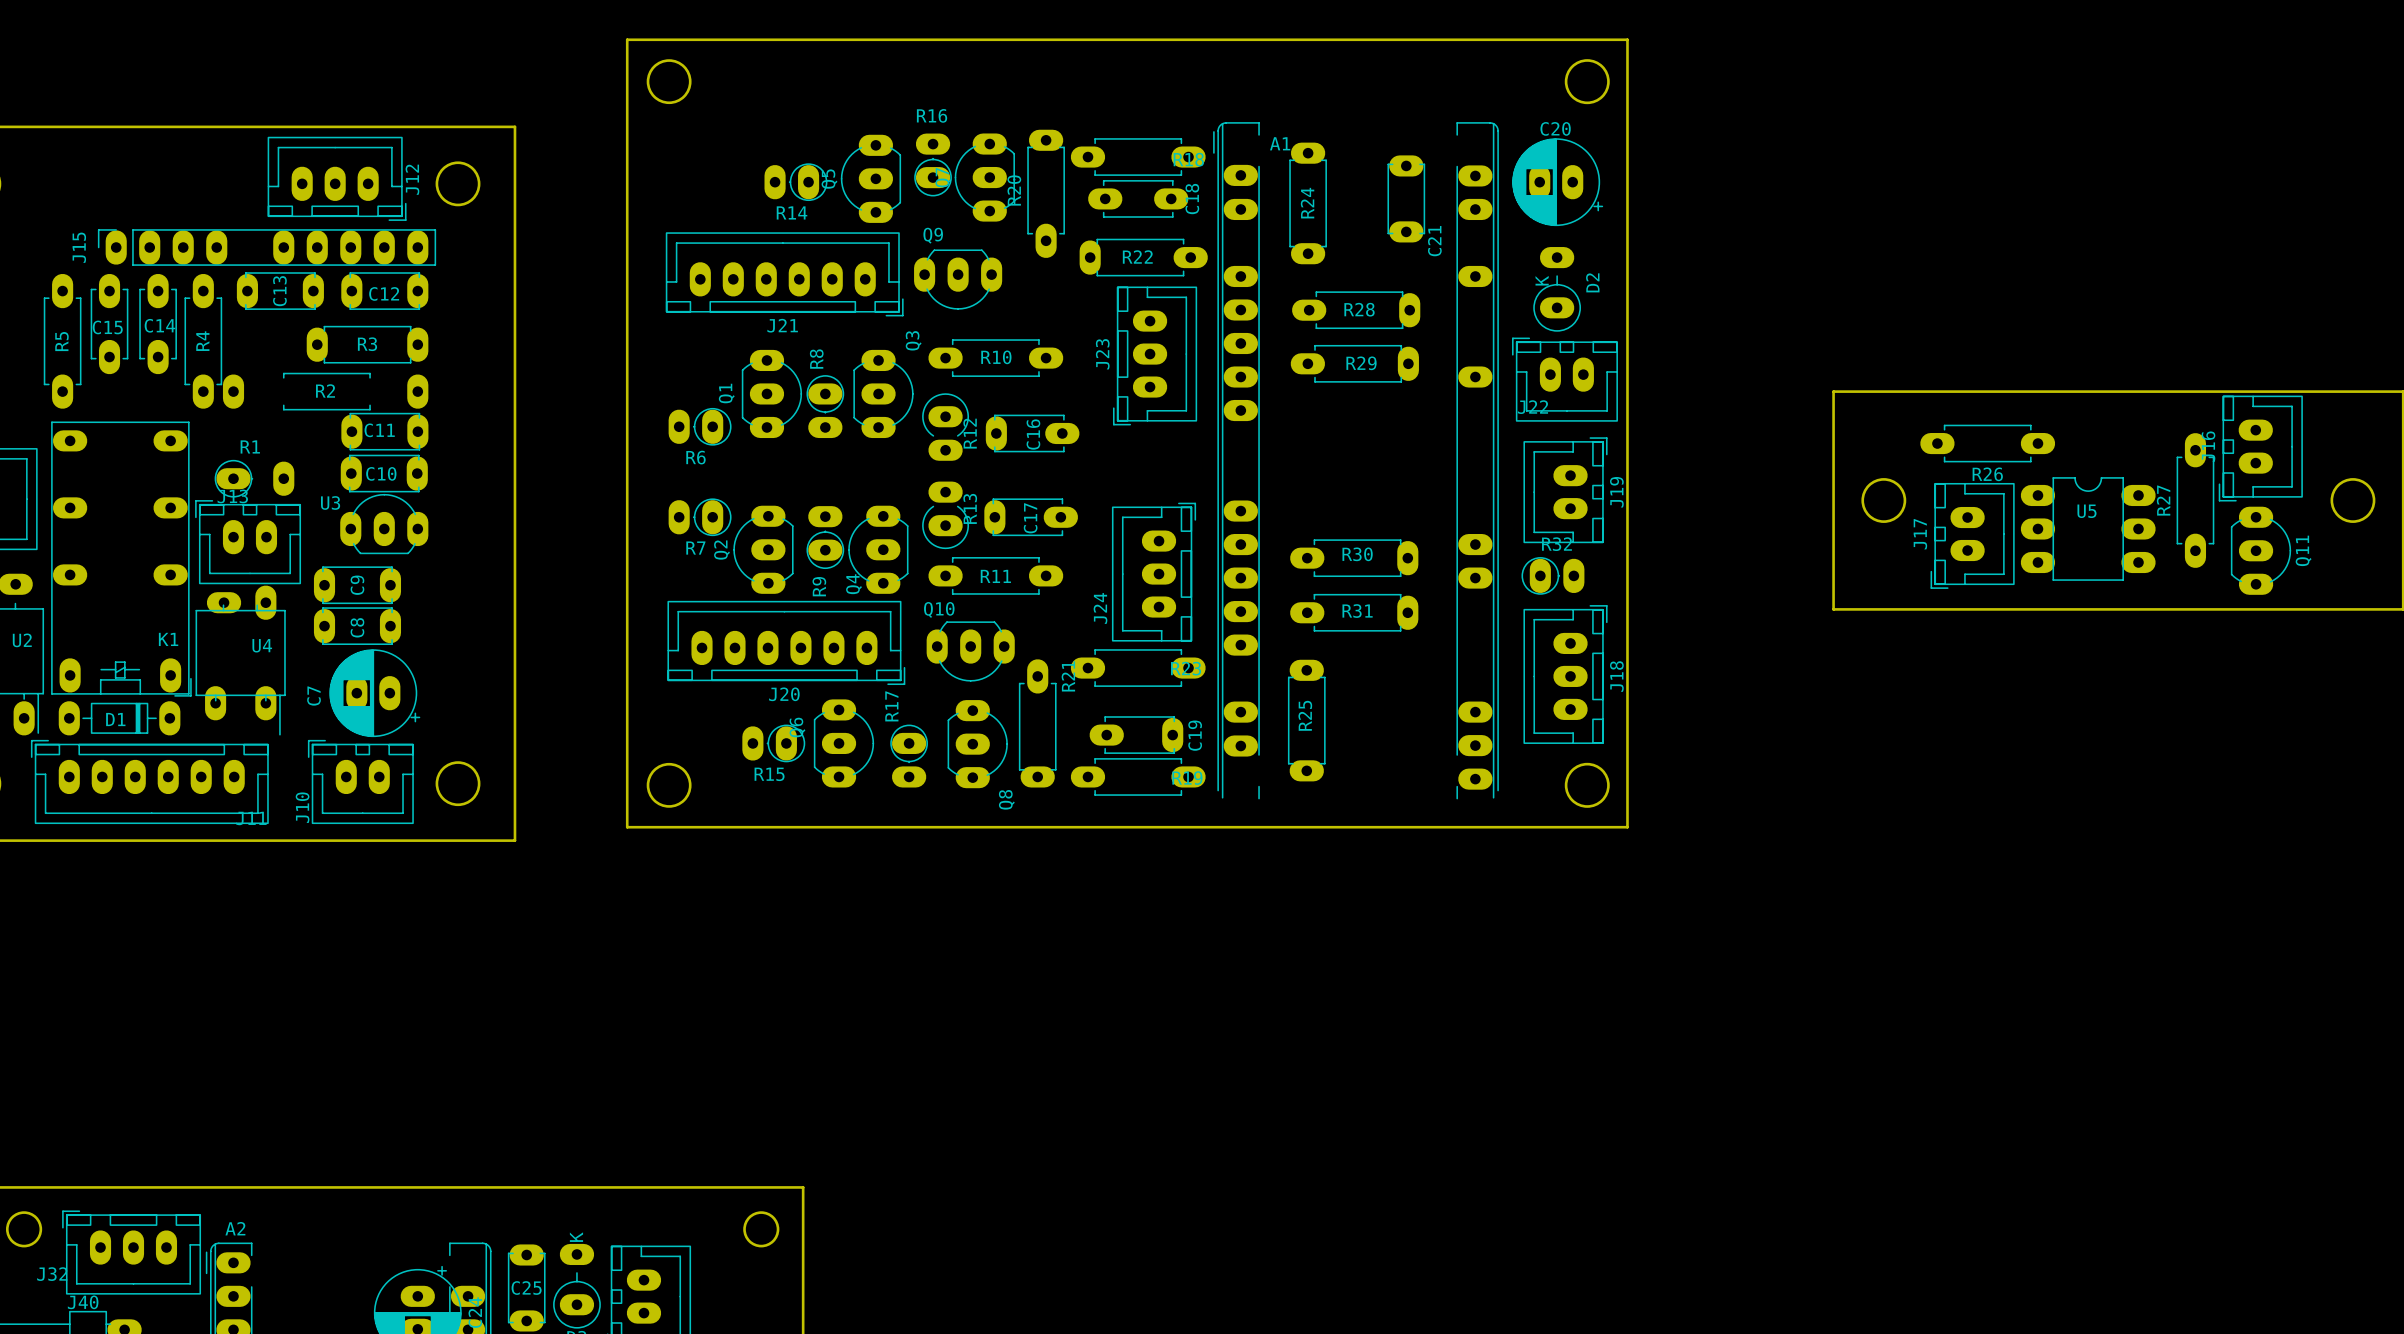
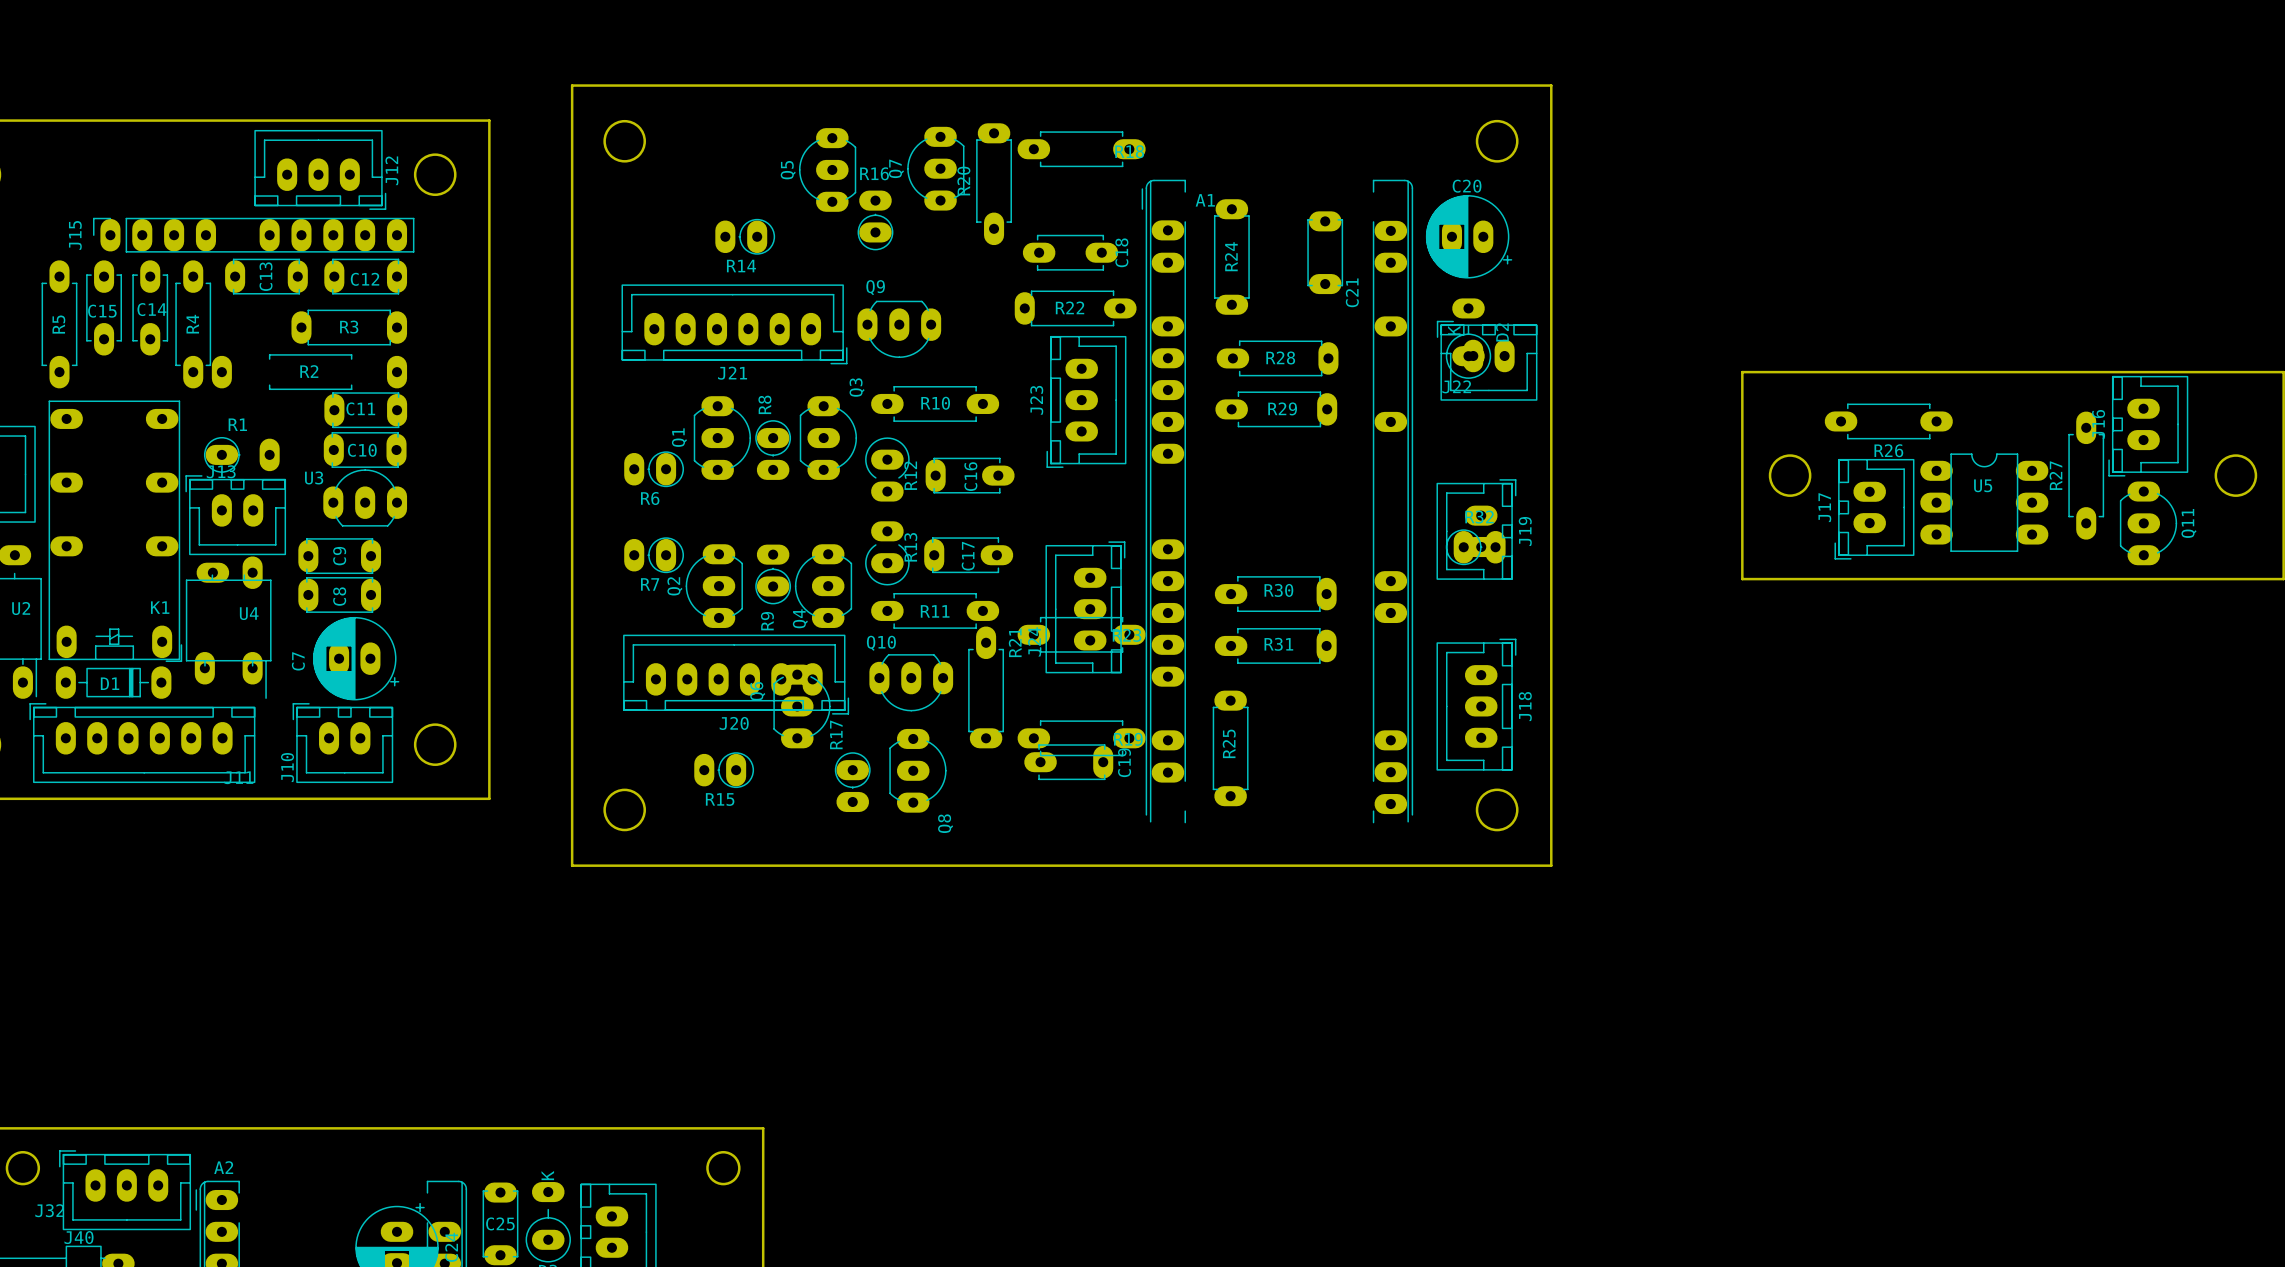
board edge: (627, 39) (1627, 39) (1627, 827) (627, 827) (627, 39) -> (572, 85) (572, 865) (1551, 865) (1551, 85) (572, 85)
round board edge position: (669, 81) -> (624, 141)
round board edge position: (1587, 81) -> (1497, 141)
R16 position: (933, 165) -> (875, 220)
R14 position: (795, 182) -> (745, 236)
C20 position: (1557, 182) -> (1469, 236)
C18 position: (1138, 198) -> (1070, 252)
C21 position: (1406, 198) -> (1325, 252)
R24 position: (1308, 203) -> (1231, 257)
R22 position: (1143, 257) -> (1075, 308)
J21 position: (784, 274) -> (734, 324)
Q9 position: (958, 279) -> (899, 329)
D2 position: (1557, 289) -> (1468, 338)
R28 position: (1356, 310) -> (1277, 358)
J23 position: (1155, 355) -> (1086, 401)
R10 position: (995, 358) -> (935, 403)
R29 position: (1354, 363) -> (1276, 409)
Q1 position: (771, 393) -> (722, 438)
Q3 position: (883, 393) -> (828, 438)
R8 position: (825, 406) -> (773, 450)
R6 position: (700, 426) -> (654, 469)
R12 position: (945, 427) -> (887, 469)
C16 position: (1032, 433) -> (970, 475)
A1 position: (1356, 460) -> (1277, 501)
J19 position: (1565, 490) -> (1476, 529)
R13 position: (945, 515) -> (887, 553)
R7 position: (700, 517) -> (654, 555)
C17 position: (1031, 517) -> (968, 555)
R9 position: (825, 537) -> (773, 574)
Q2 position: (763, 549) -> (714, 586)
Q4 position: (878, 549) -> (823, 586)
R30 position: (1354, 558) -> (1275, 594)
J24 position: (1154, 572) -> (1085, 607)
R11 position: (995, 575) -> (935, 610)
R31 position: (1354, 612) -> (1275, 645)
J20 position: (786, 642) -> (736, 674)
Q10 position: (970, 651) -> (911, 682)
J18 position: (1565, 674) -> (1476, 704)
R25 position: (1306, 720) -> (1230, 748)
C19 position: (1136, 735) -> (1068, 762)
R15 position: (773, 743) -> (724, 770)
Q8 position: (977, 744) -> (917, 770)
R17 position: (909, 756) -> (852, 782)
round board edge position: (669, 785) -> (624, 809)
round board edge position: (1587, 785) -> (1497, 809)

